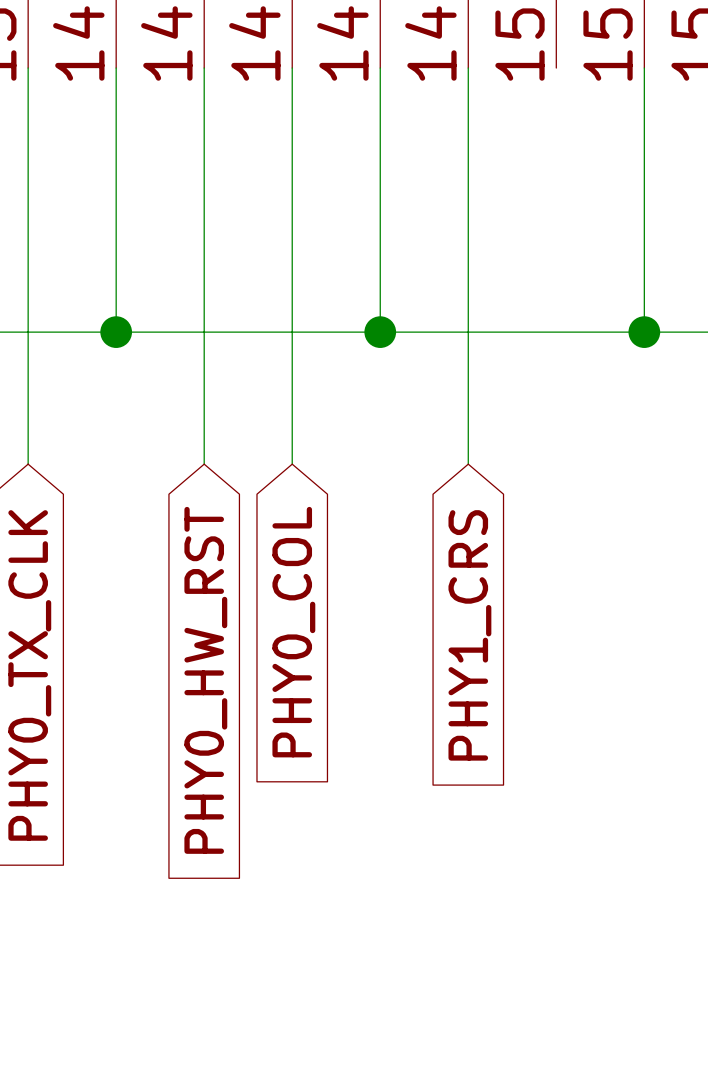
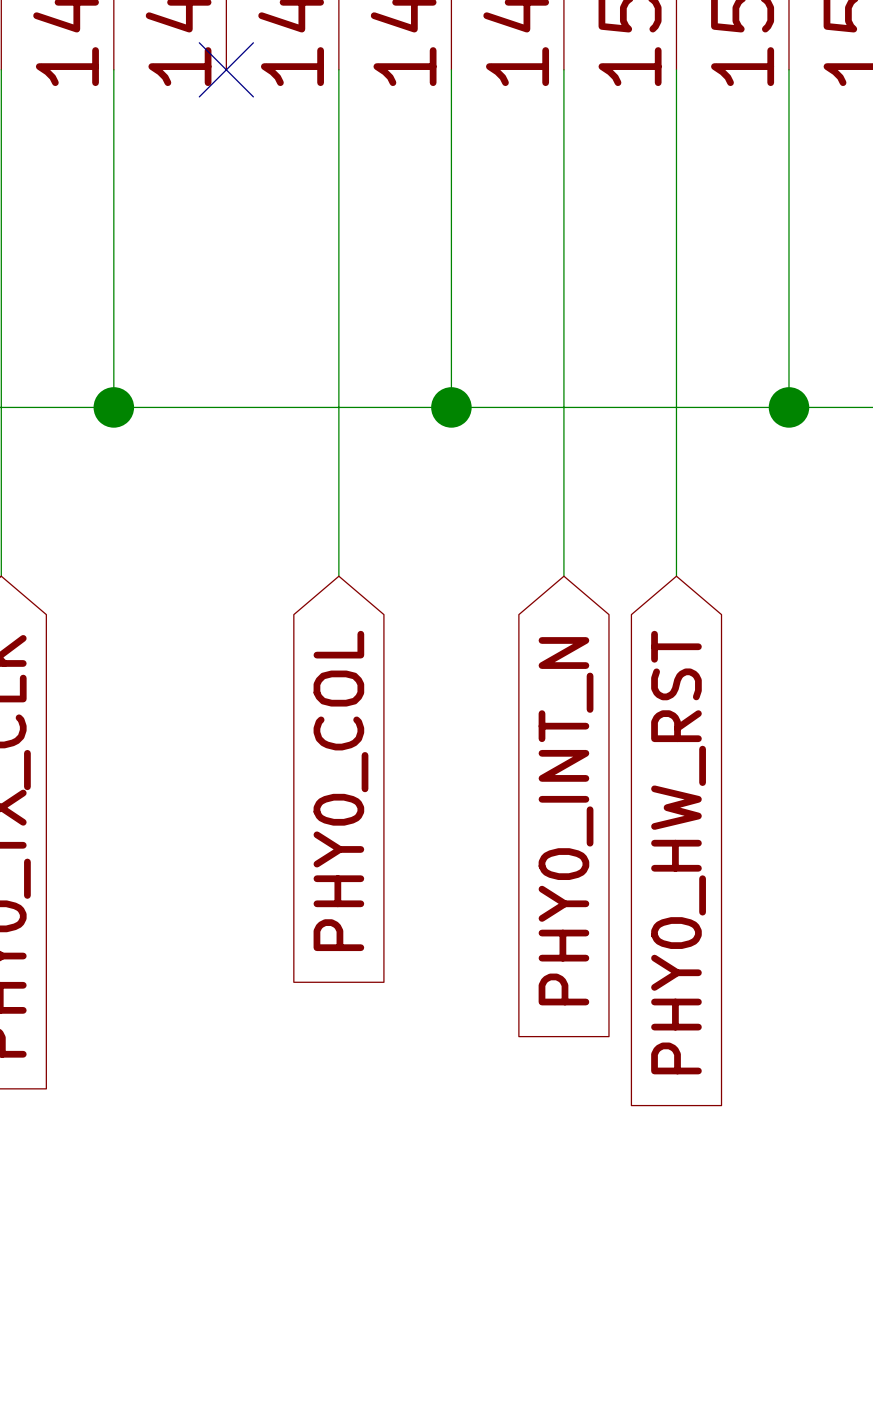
wire: (204, 68) (204, 464) -> (676, 69) (676, 576)
no-connect mark: none -> (226, 69)
global label: PHY1_CRS (469, 635) -> PHY0_INT_N (566, 821)
global label position: PHY0_HW_RST (205, 680) -> PHY0_HW_RST (678, 852)

